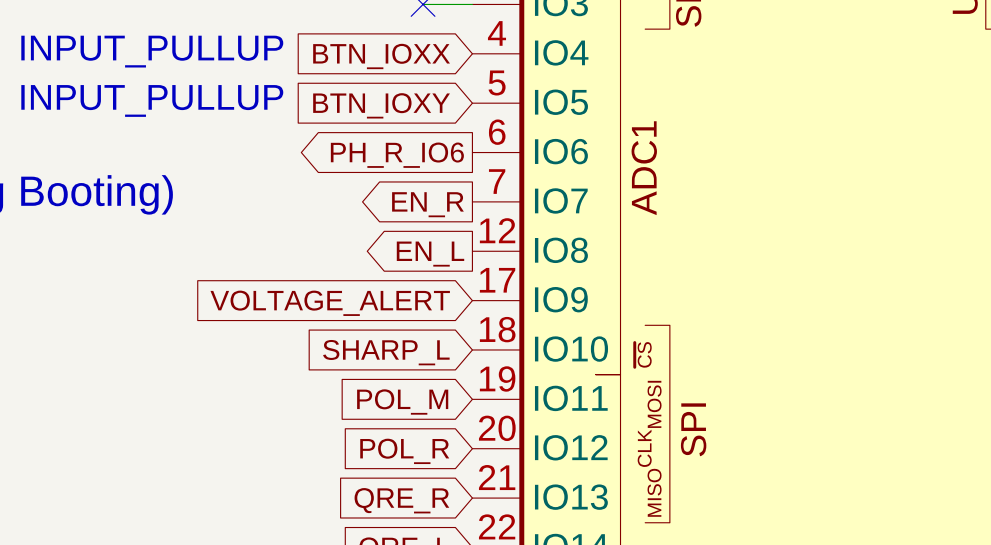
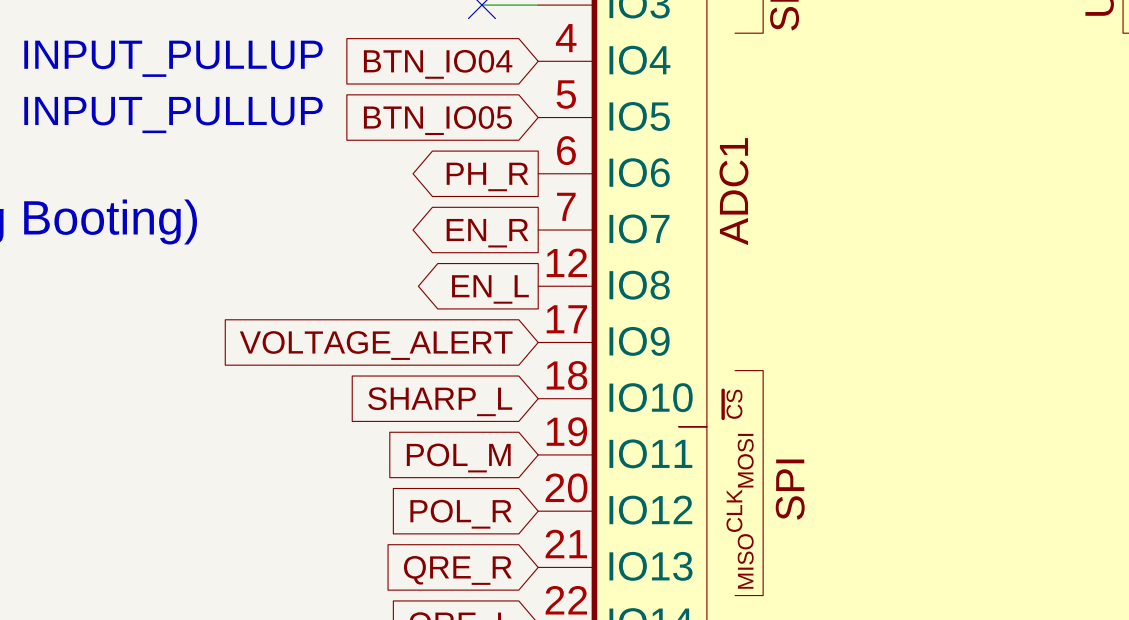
global label: BTN_IOXX (381, 56) -> BTN_IO04 (438, 64)
global label: BTN_IOXY (381, 105) -> BTN_IO05 (437, 120)
global label: PH_R_IO6 (397, 155) -> PH_R (487, 176)

